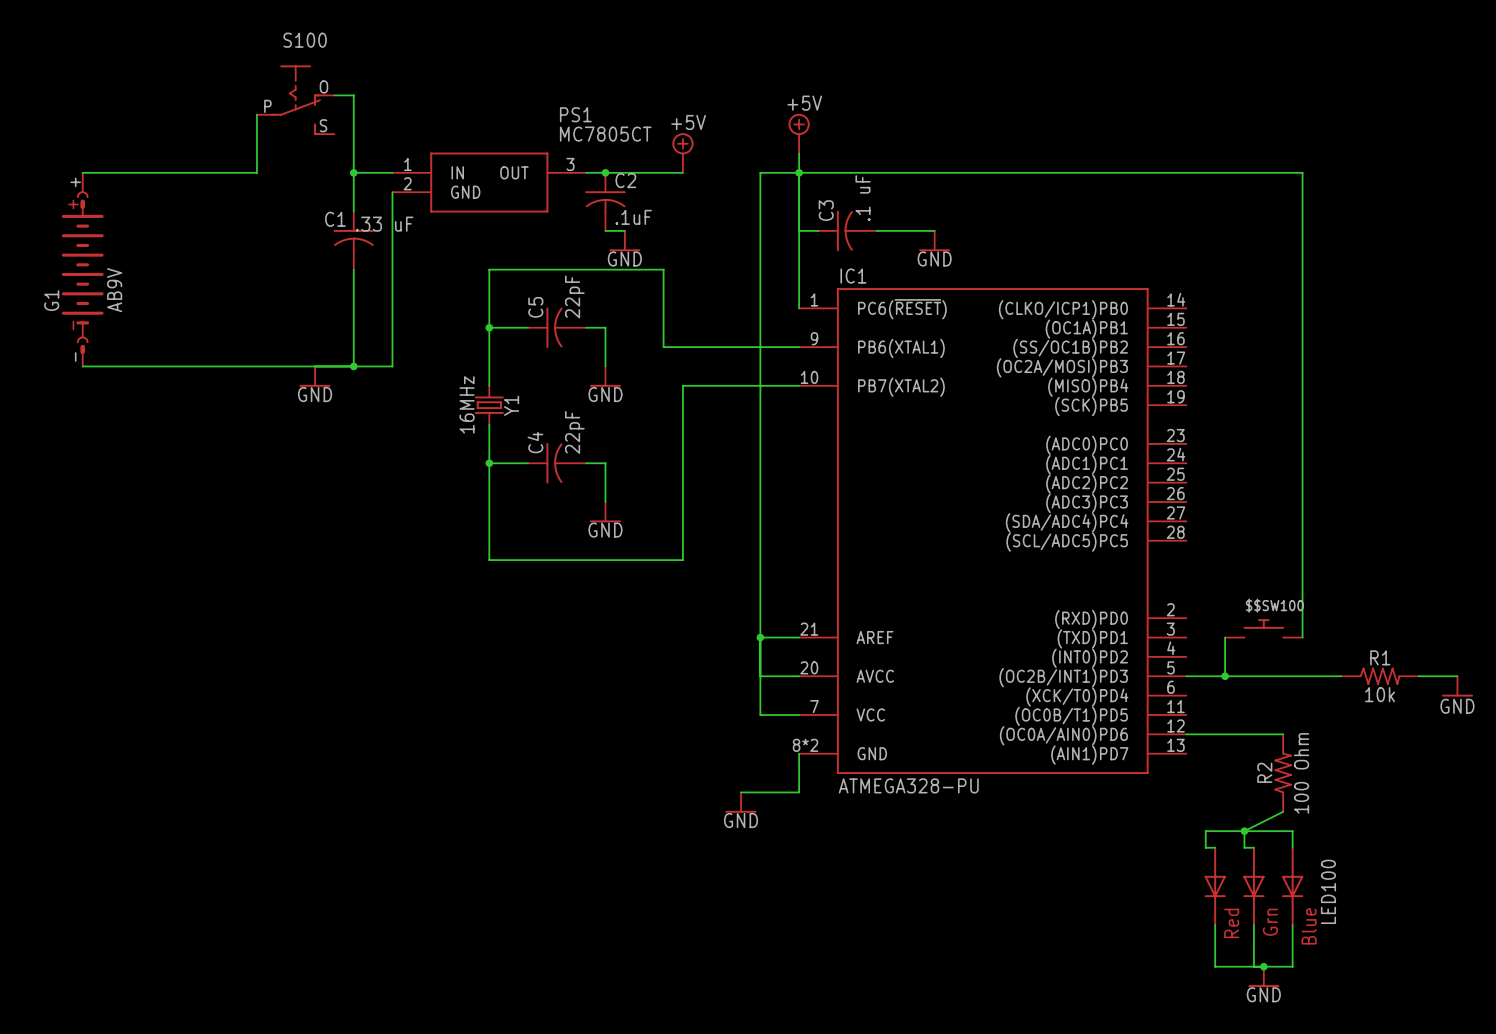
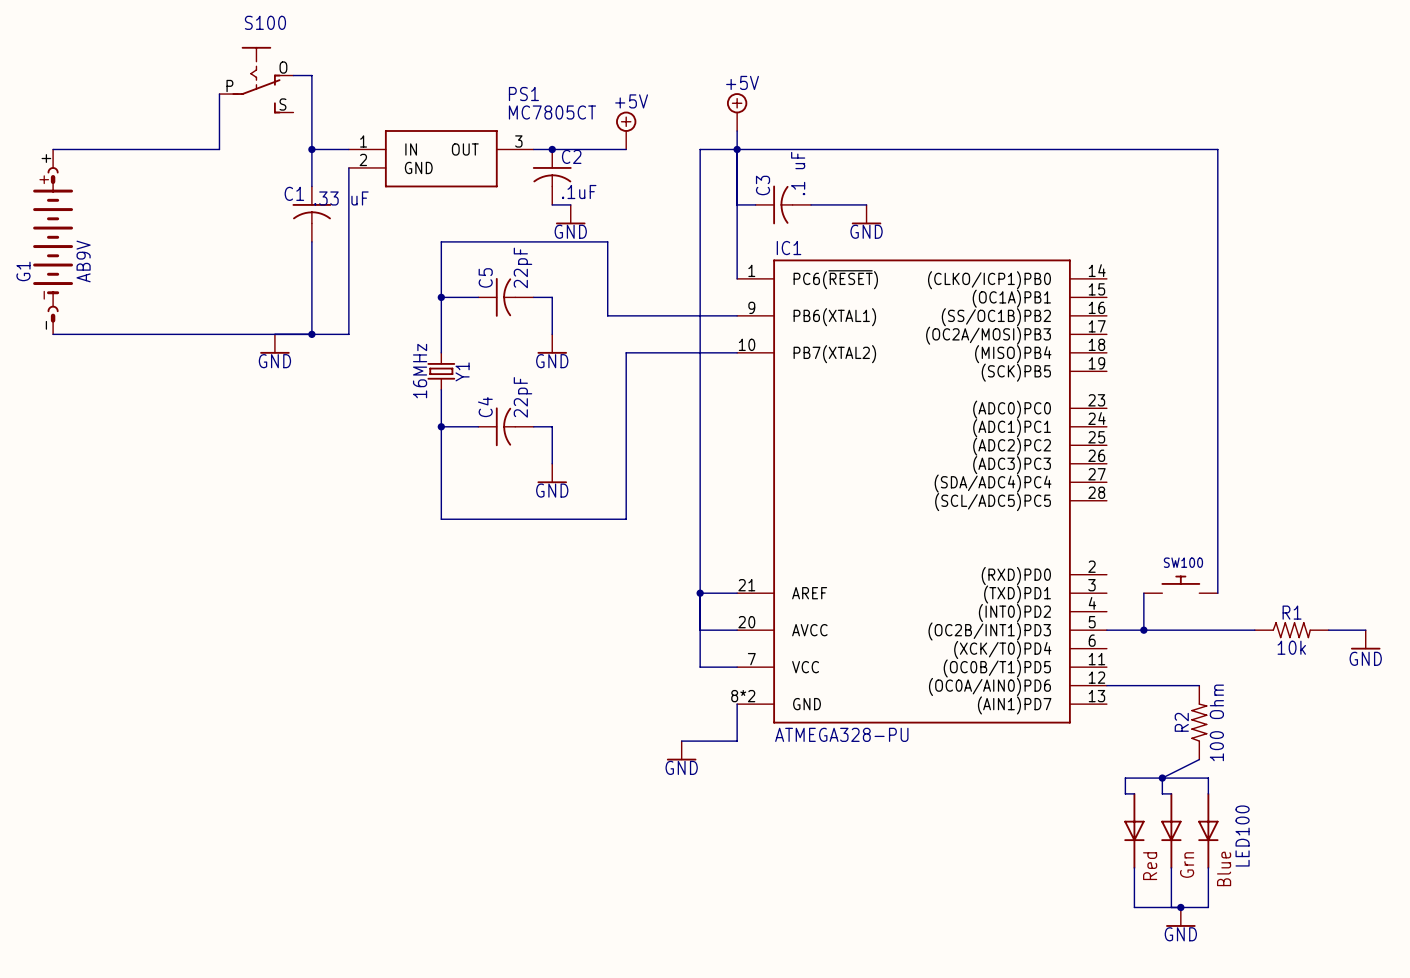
$$SW100 name: $$SW100 (1274, 605) -> SW100 (1183, 562)

